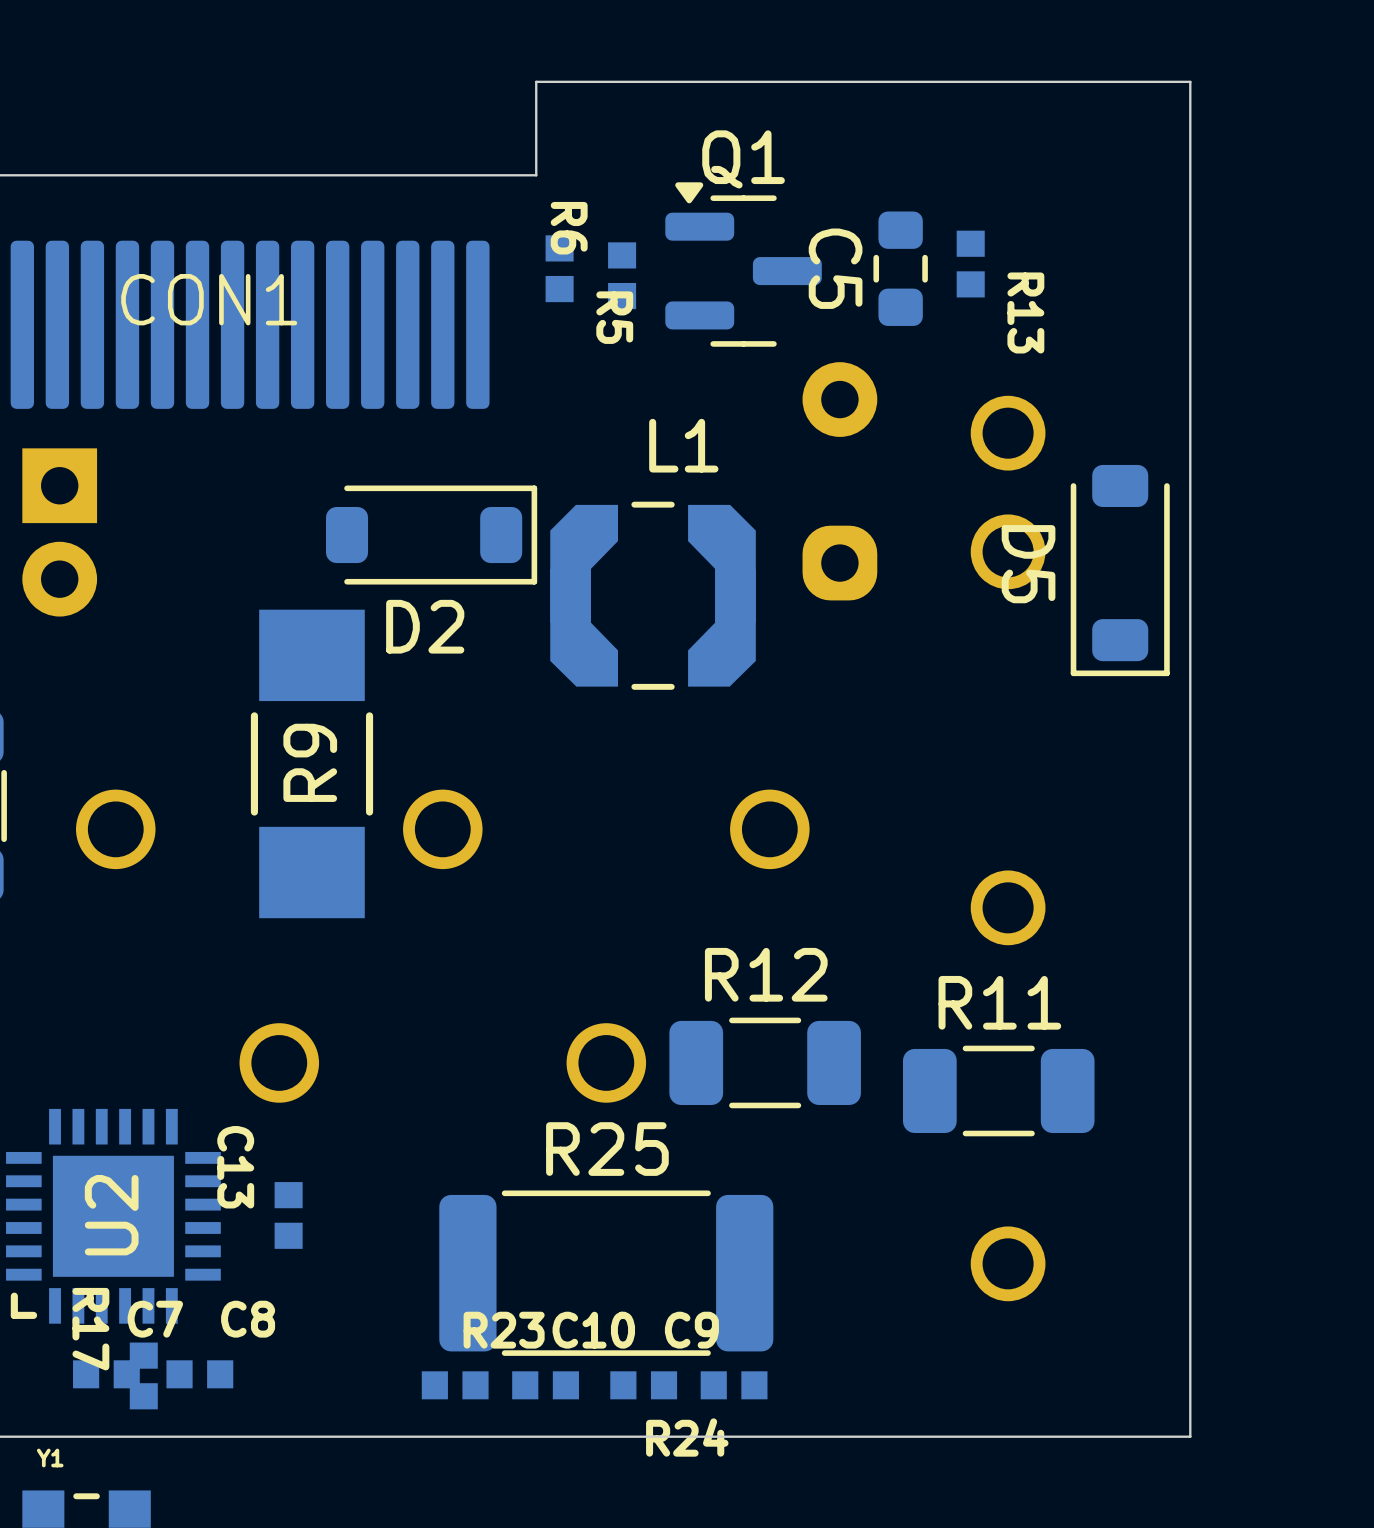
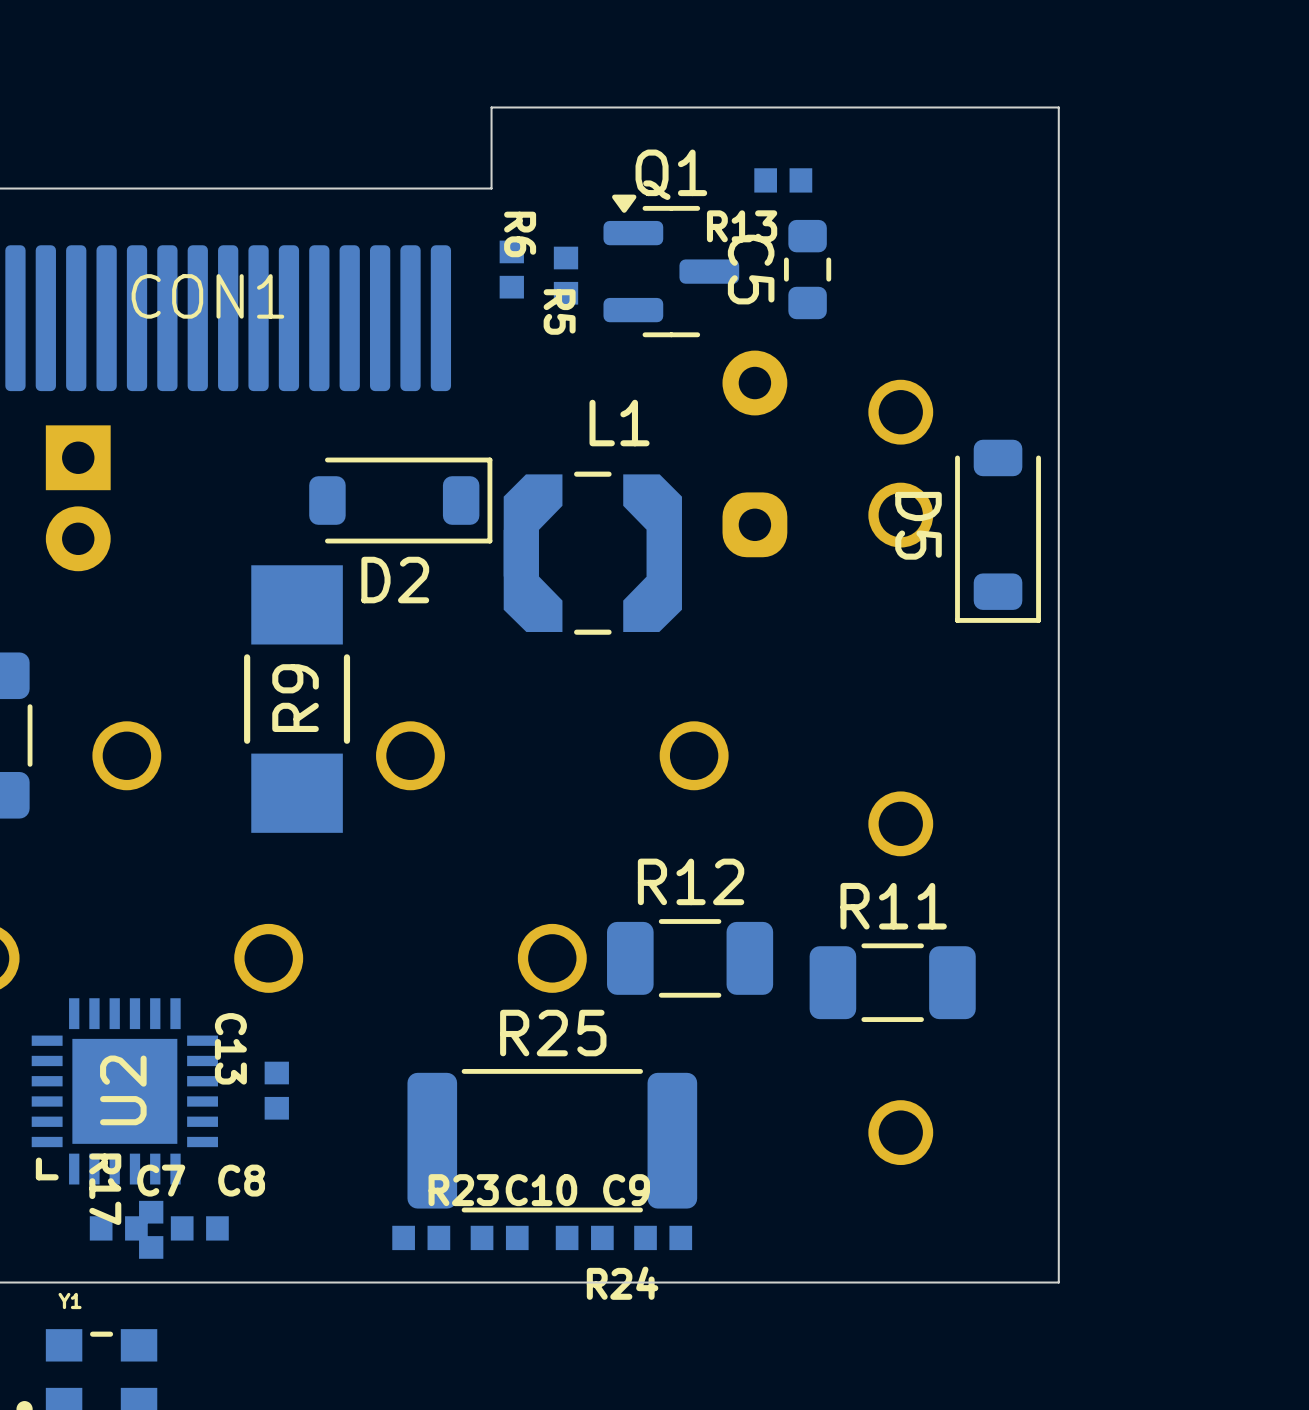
R13 rotation: 0° (970, 264) -> 90° clockwise (783, 180)
R13 position: (970, 264) -> (783, 180)

